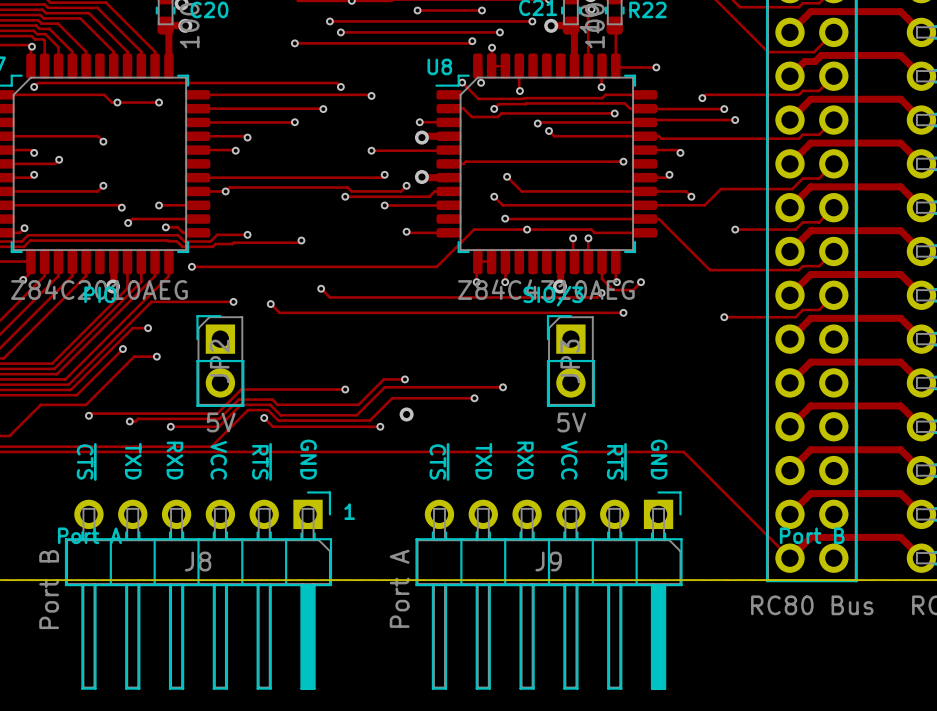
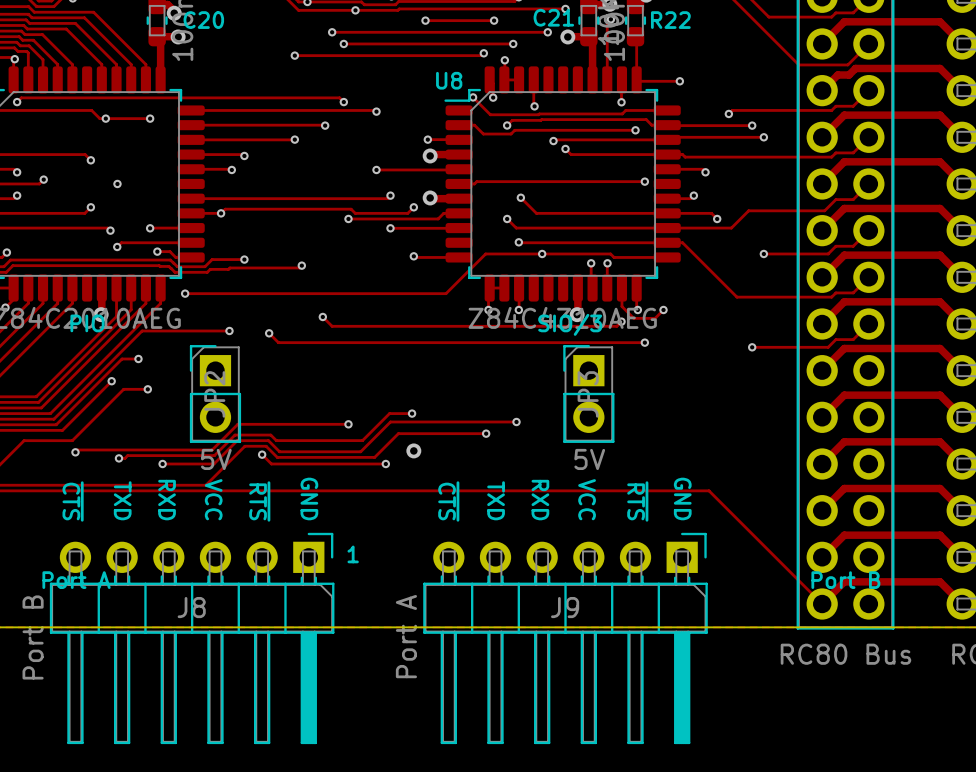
via: none -> (117, 183)

